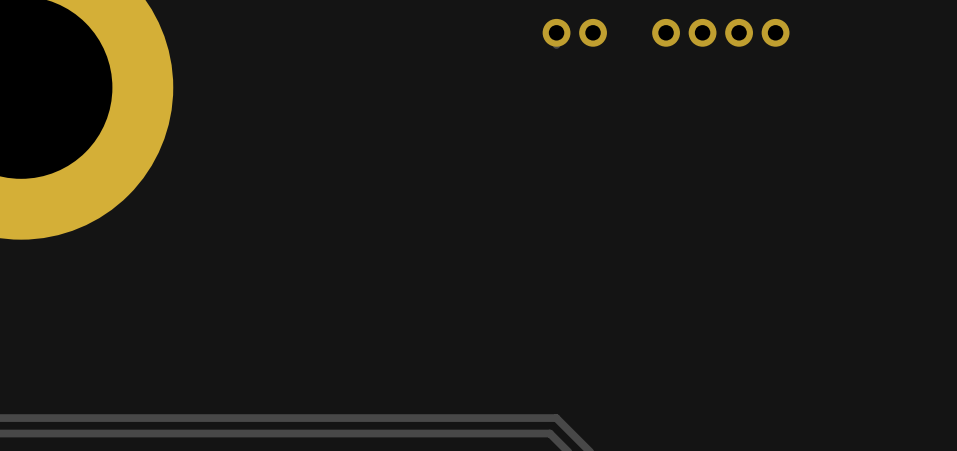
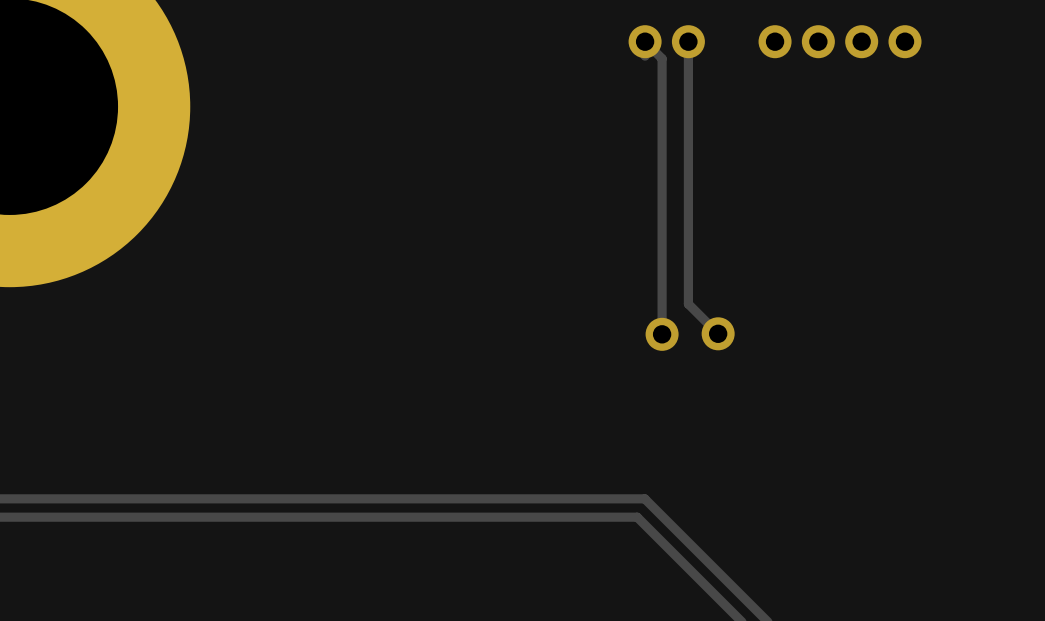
track: none -> (645, 41) (662, 58) (662, 334)
track: none -> (688, 41) (688, 304) (718, 333)
via: none -> (718, 333)
via: none -> (662, 334)

